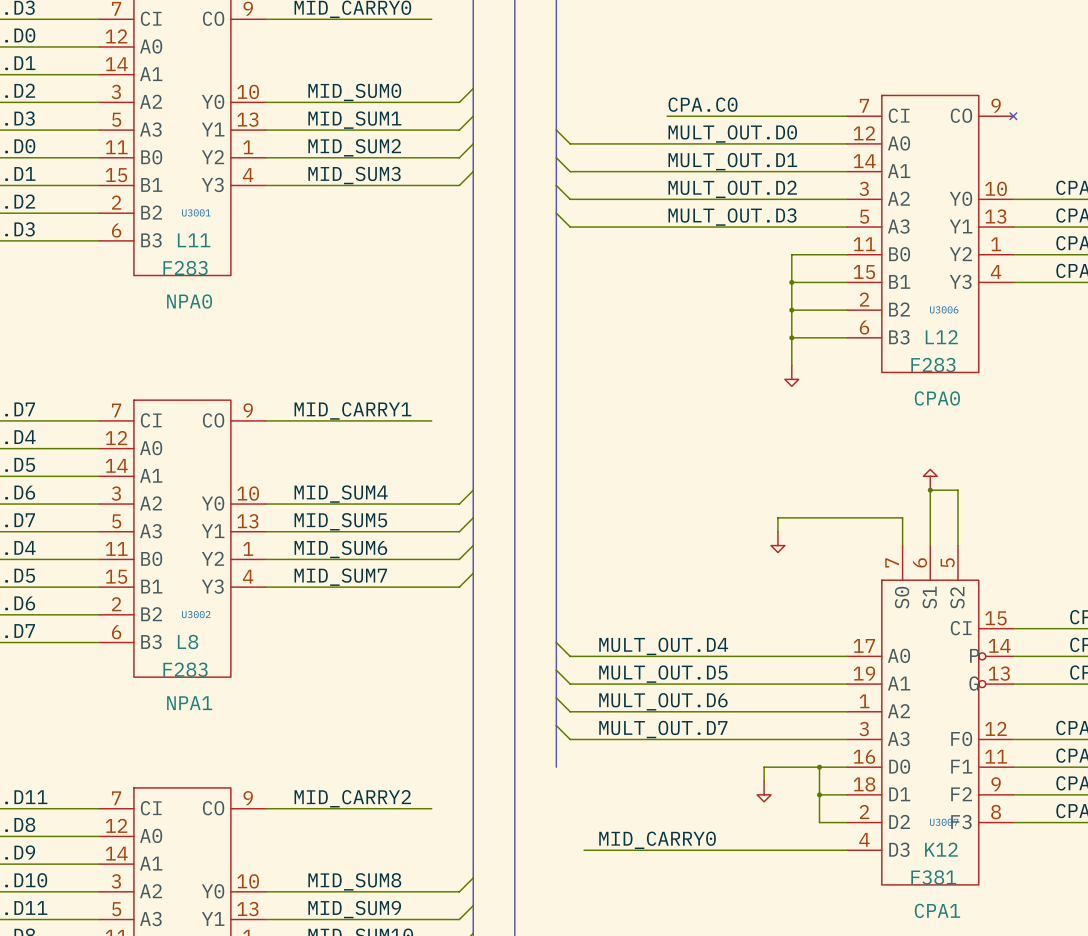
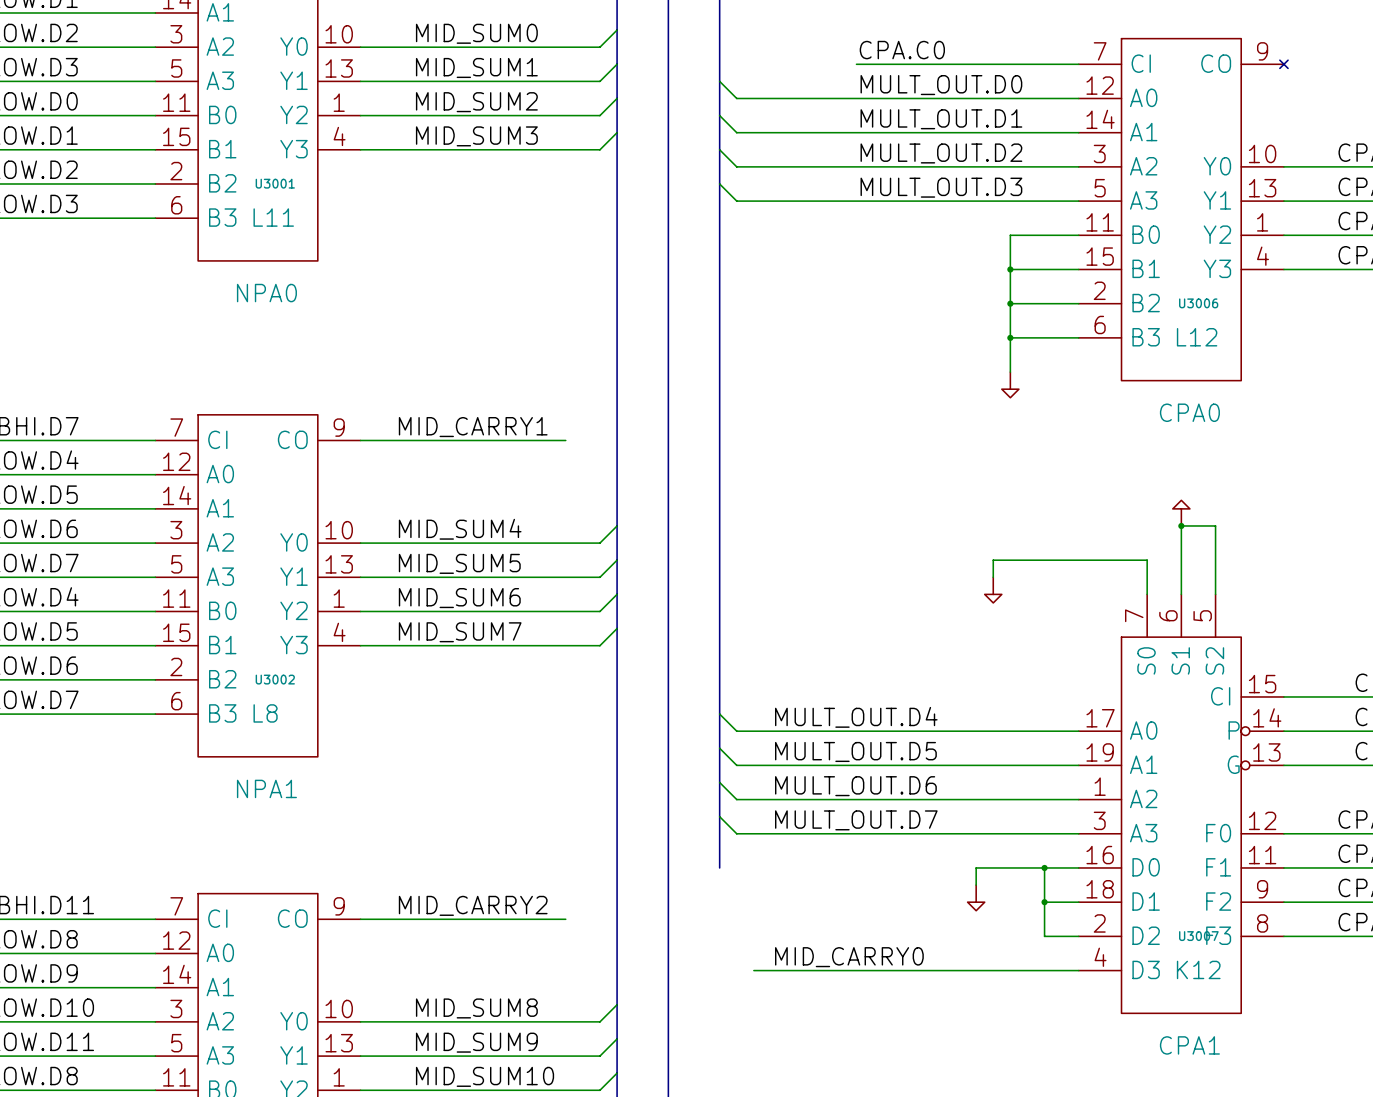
U3001 value: F283 (185, 268) -> none
U3006 value: F283 (933, 365) -> none
U3002 value: F283 (185, 669) -> none
U3007 value: F381 (933, 877) -> none

